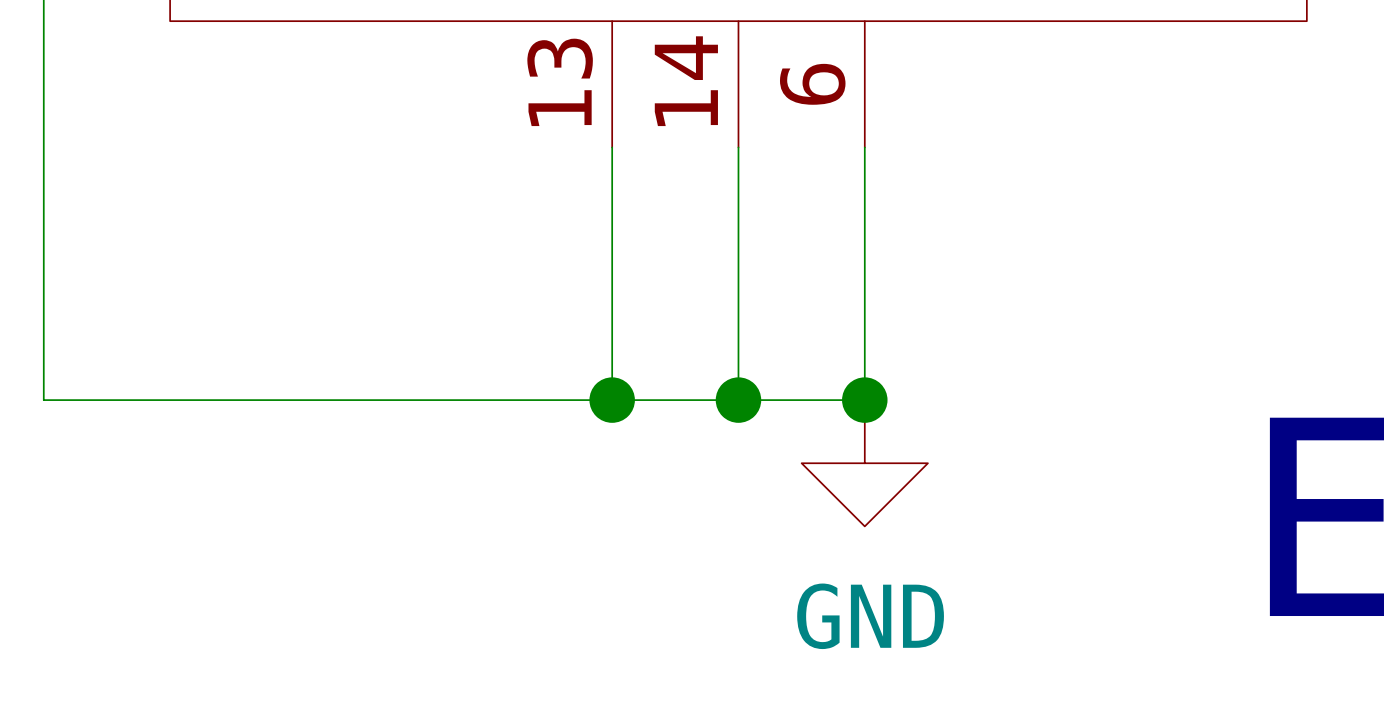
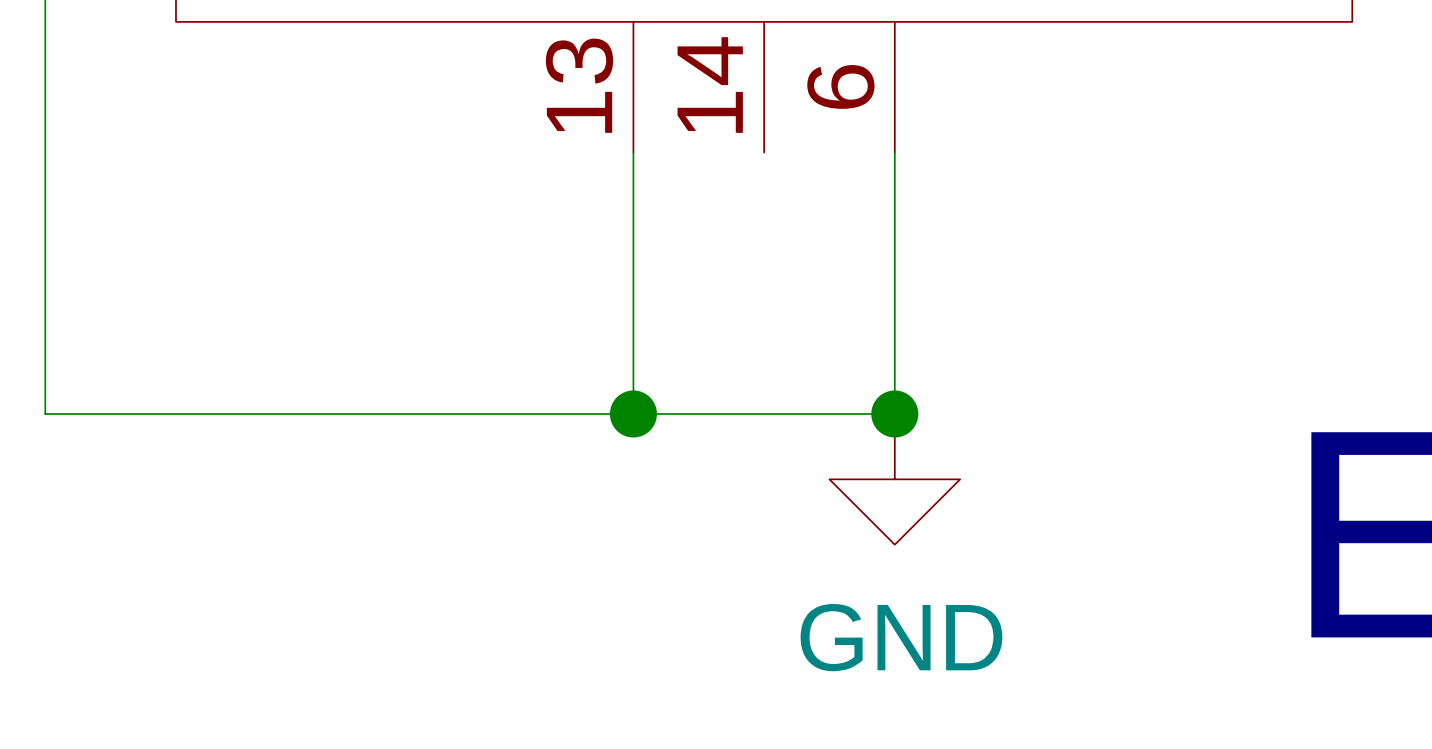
wire: (738, 147) (738, 400) -> none
junction: (738, 400) -> none

